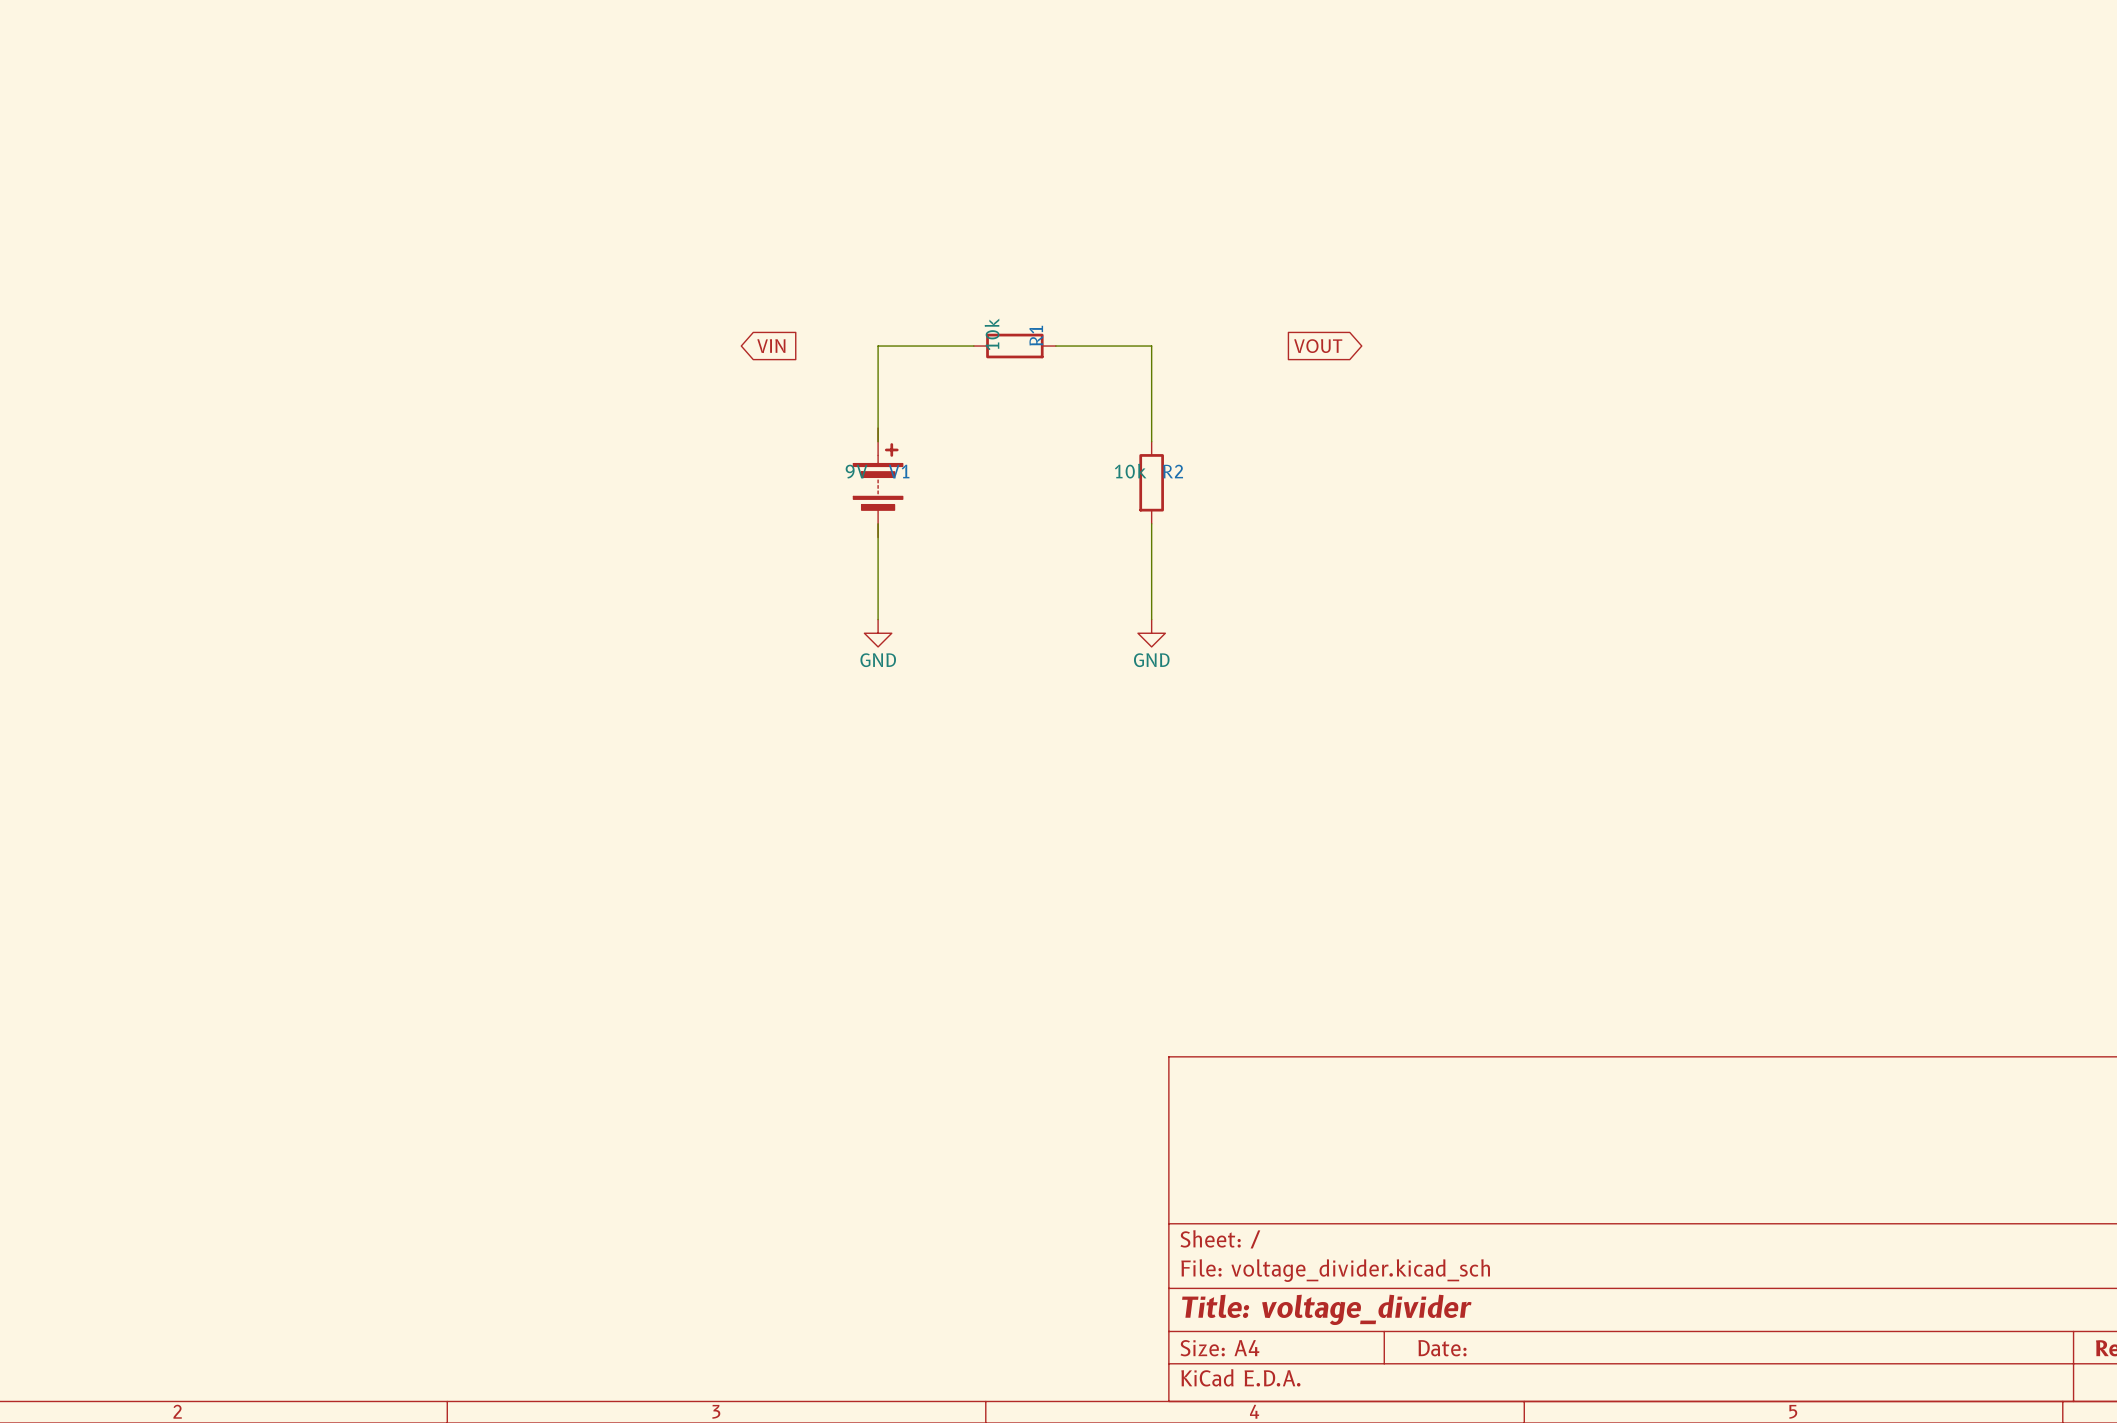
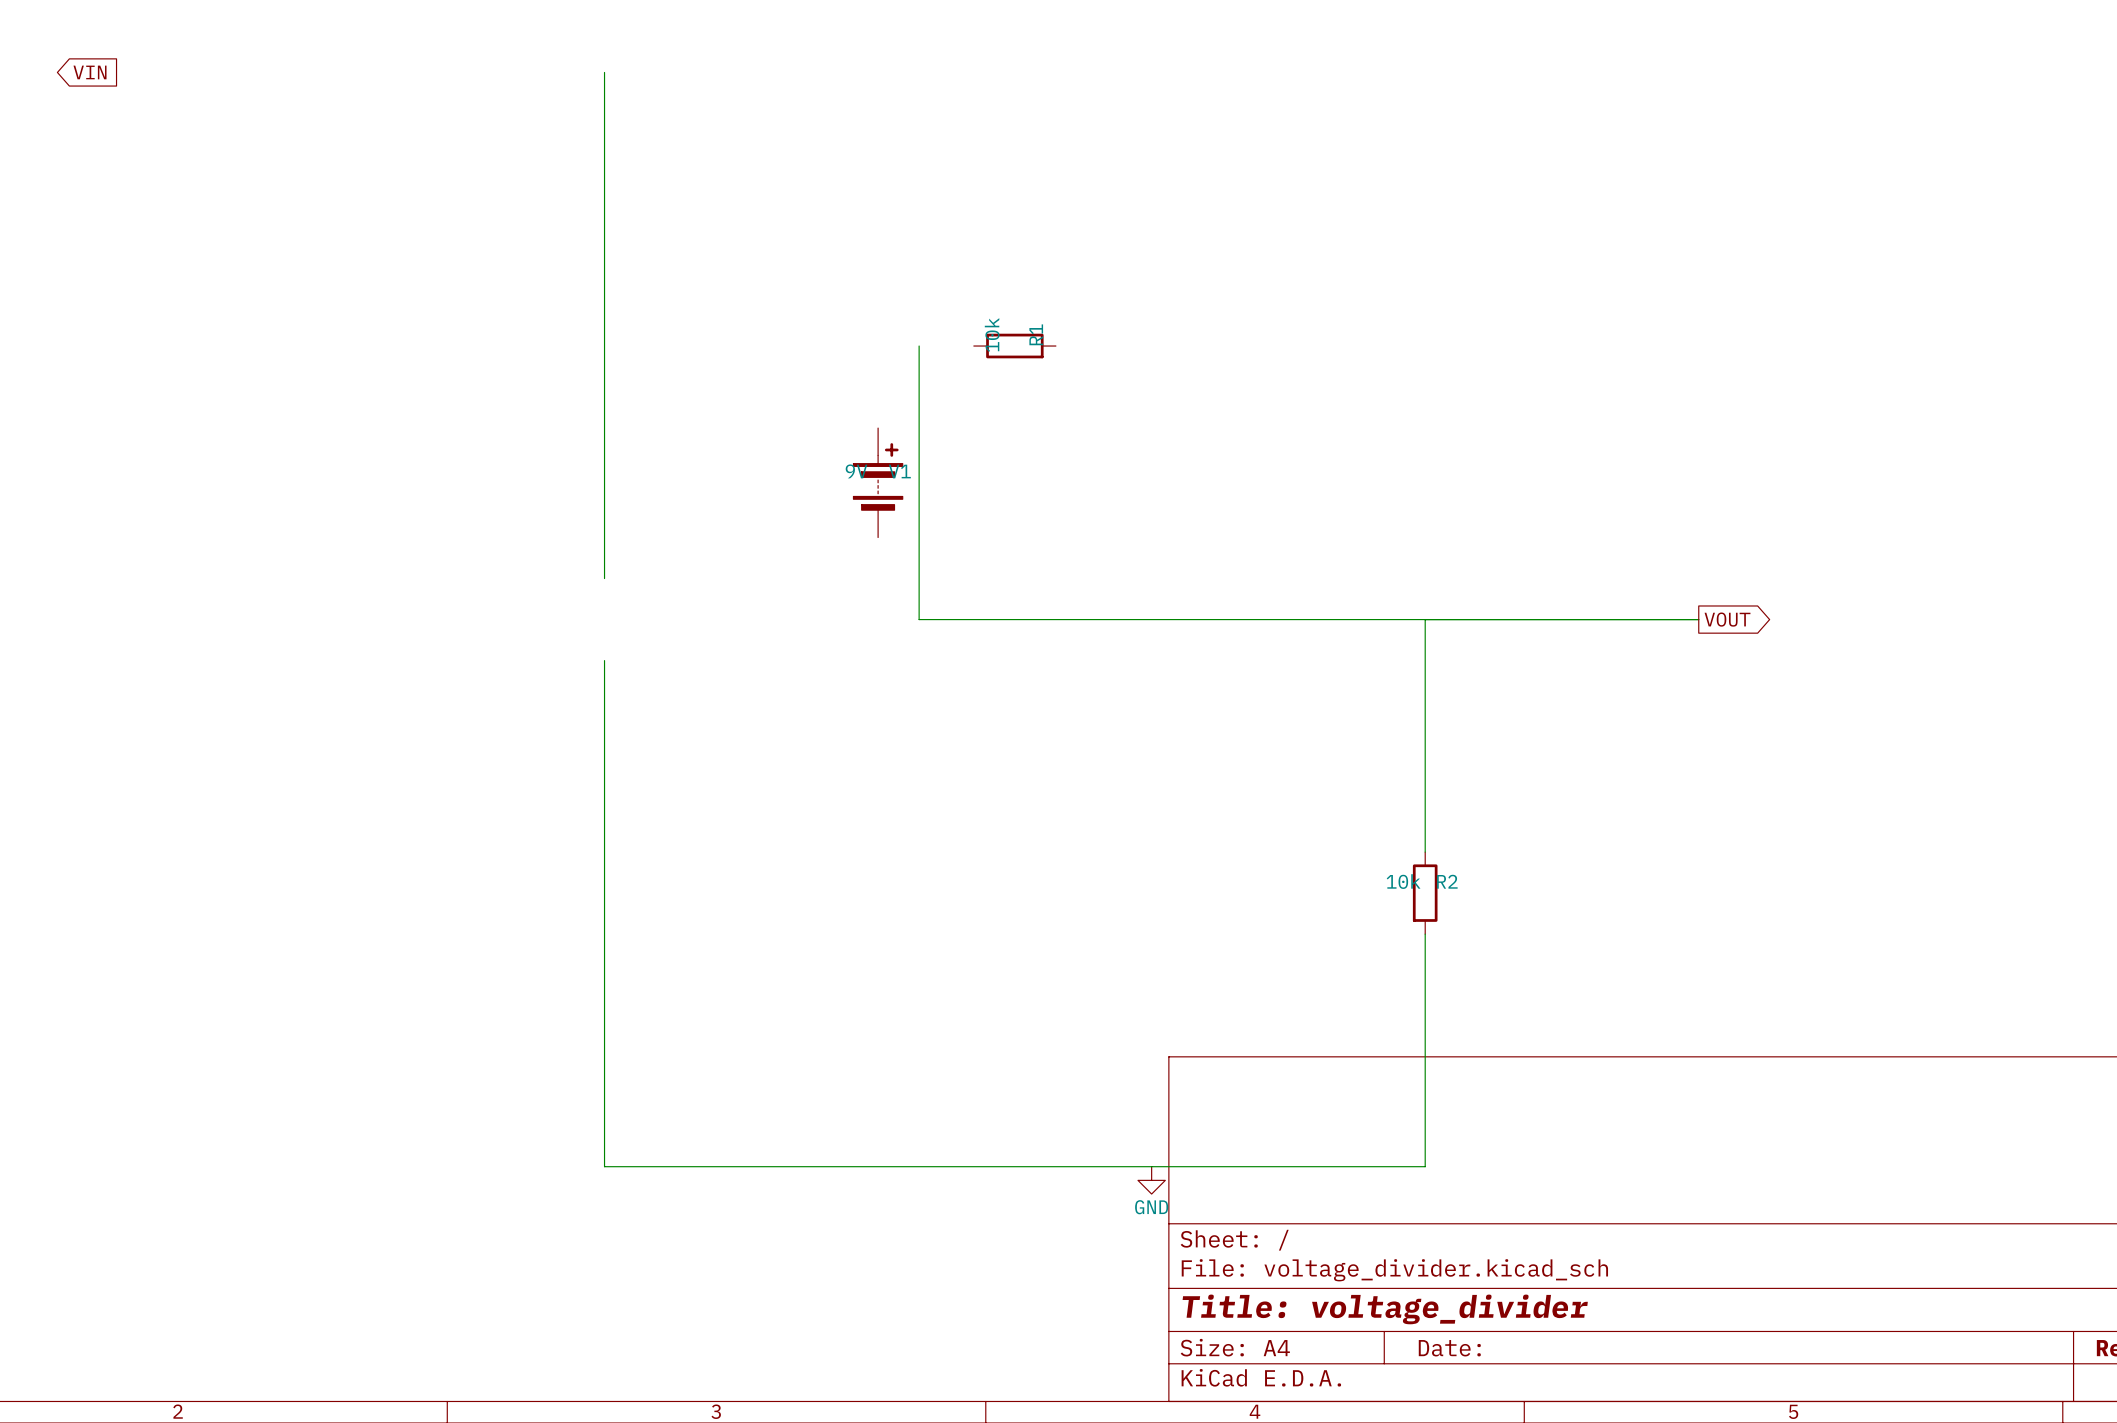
global label: none -> VIN (90, 72)
wire: none -> (604, 72) (604, 578)
global label: VIN (771, 346) -> none
wire: none -> (919, 346) (919, 619) (1698, 619)
wire: (973, 346) (878, 346) (878, 441) -> none
wire: (1055, 346) (1151, 346) (1151, 441) -> none
global label: VOUT (1318, 346) -> none
R2 position: (1151, 482) -> (1425, 893)
wire: (878, 523) (878, 619) -> none
wire: (1151, 523) (1151, 619) -> none
wire: none -> (1425, 619) (1425, 852)
global label: none -> VOUT (1727, 619)
power symbol: GND (878, 633) -> none
power symbol: GND (1151, 633) -> none
wire: none -> (604, 660) (604, 1166) (1425, 1166) (1425, 934)
power symbol: none -> GND (1151, 1180)

